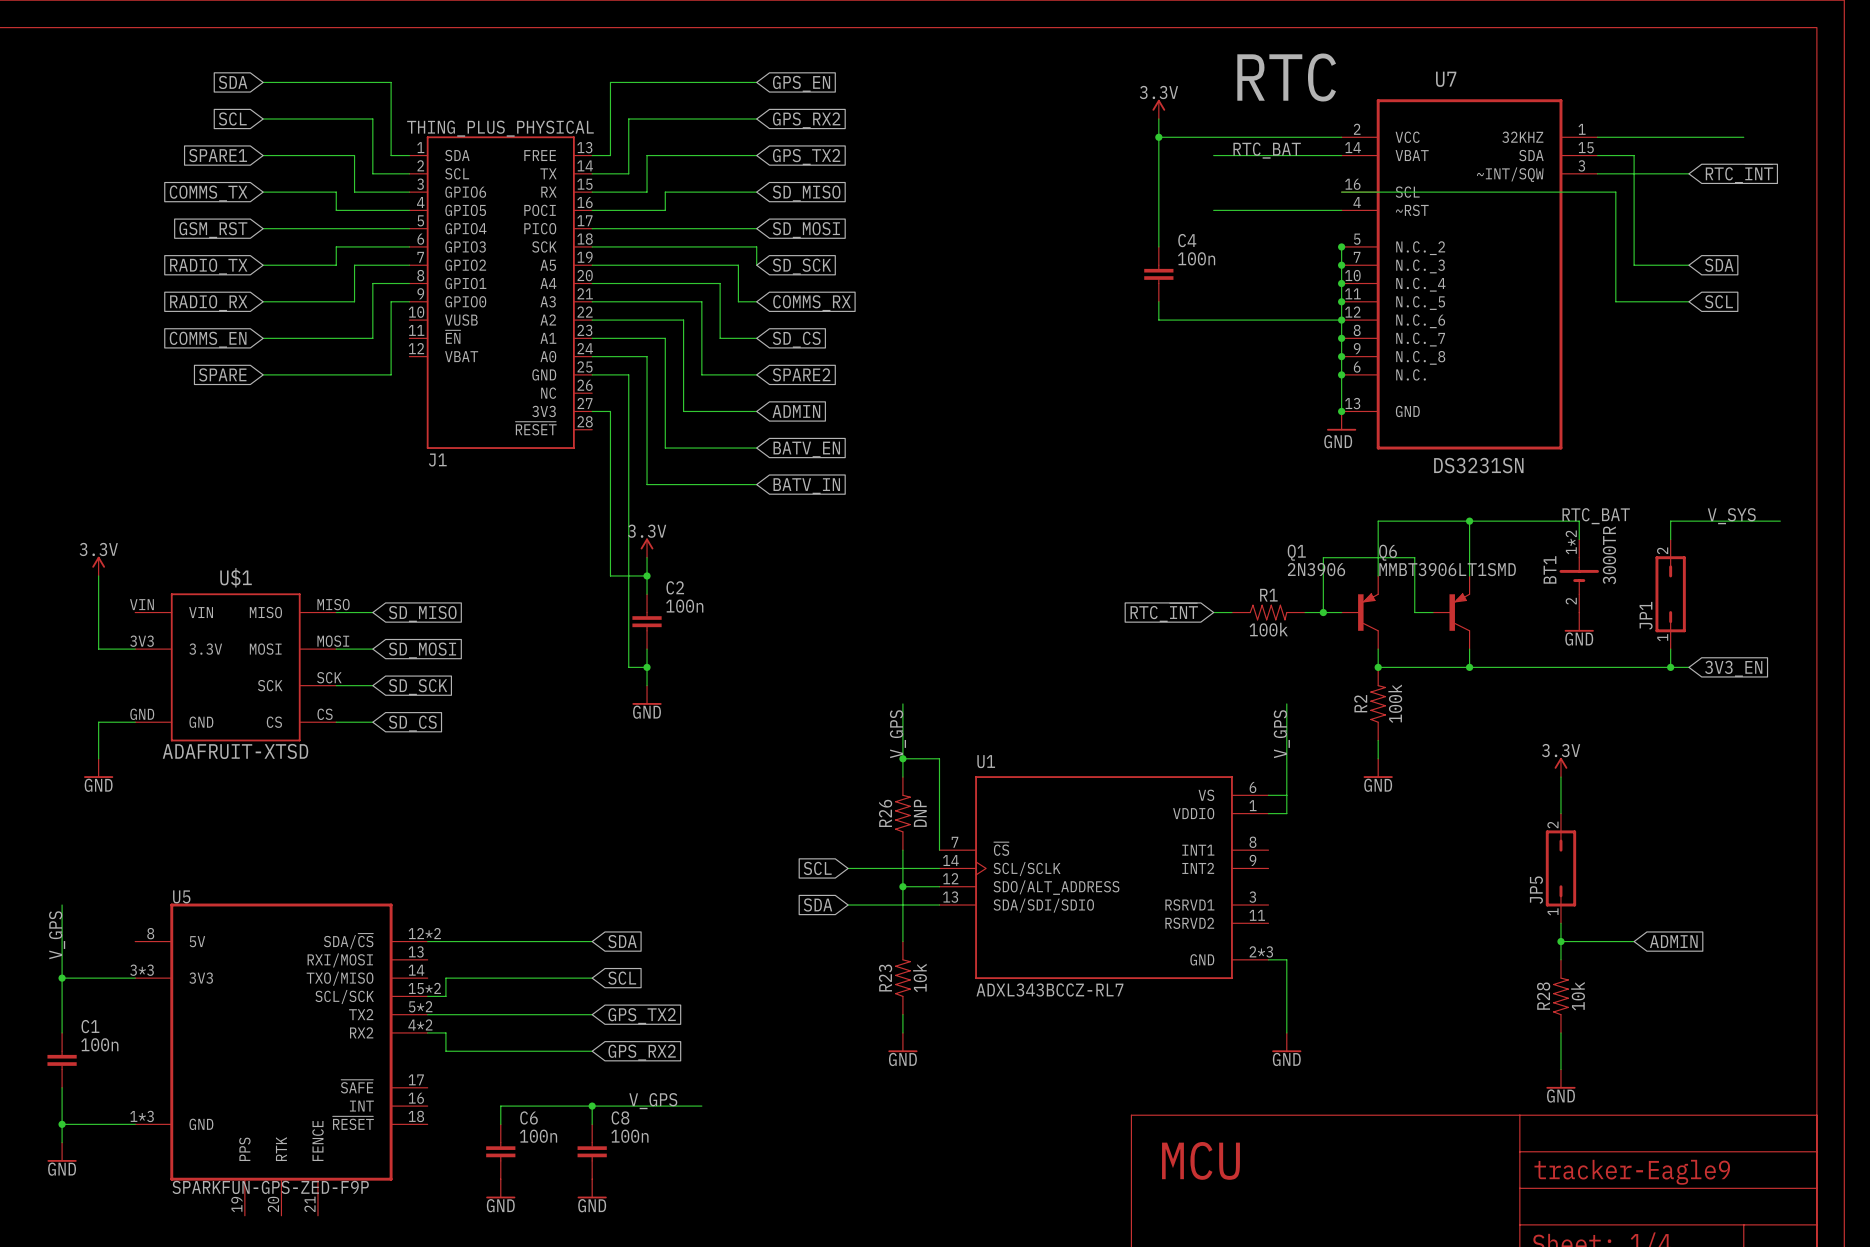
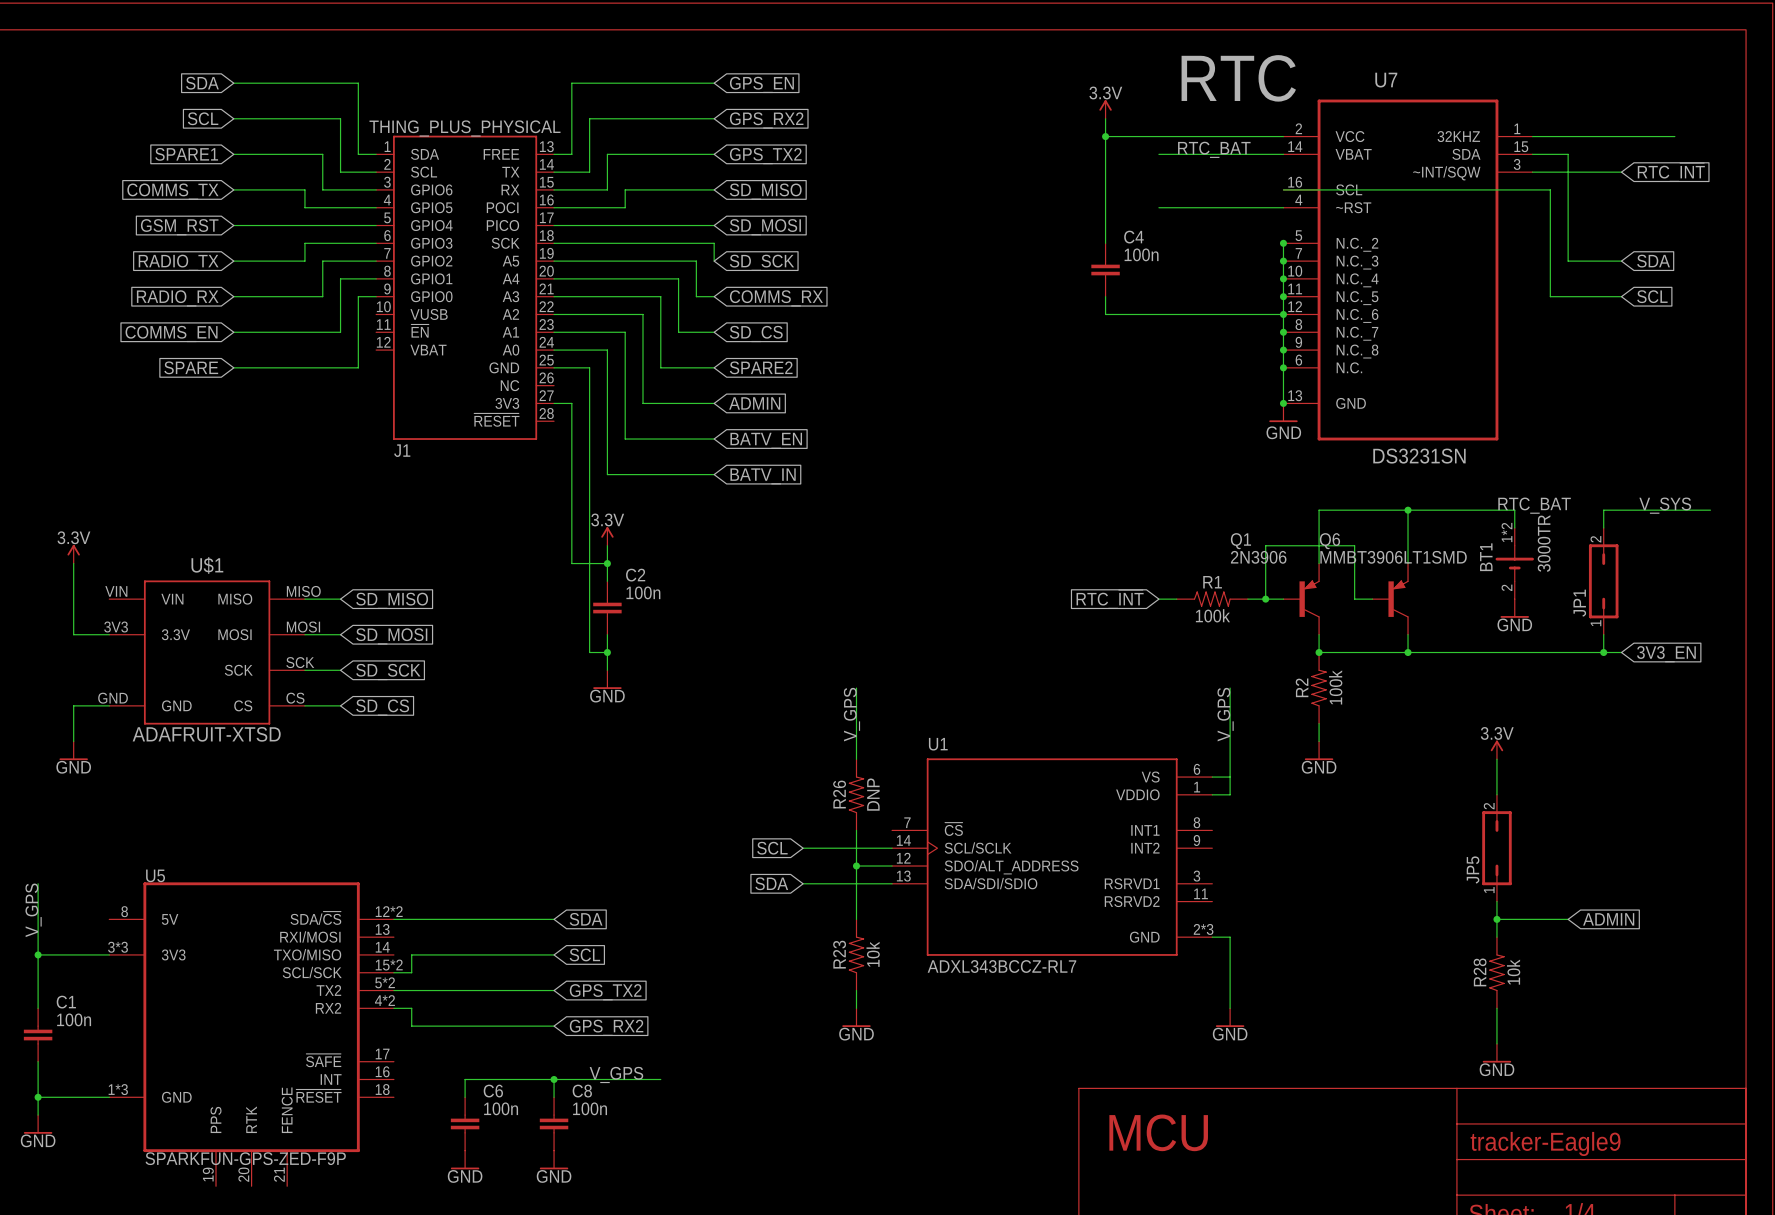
wire: (902, 758) (939, 758) (939, 850) -> none
junction: (902, 758) -> none

